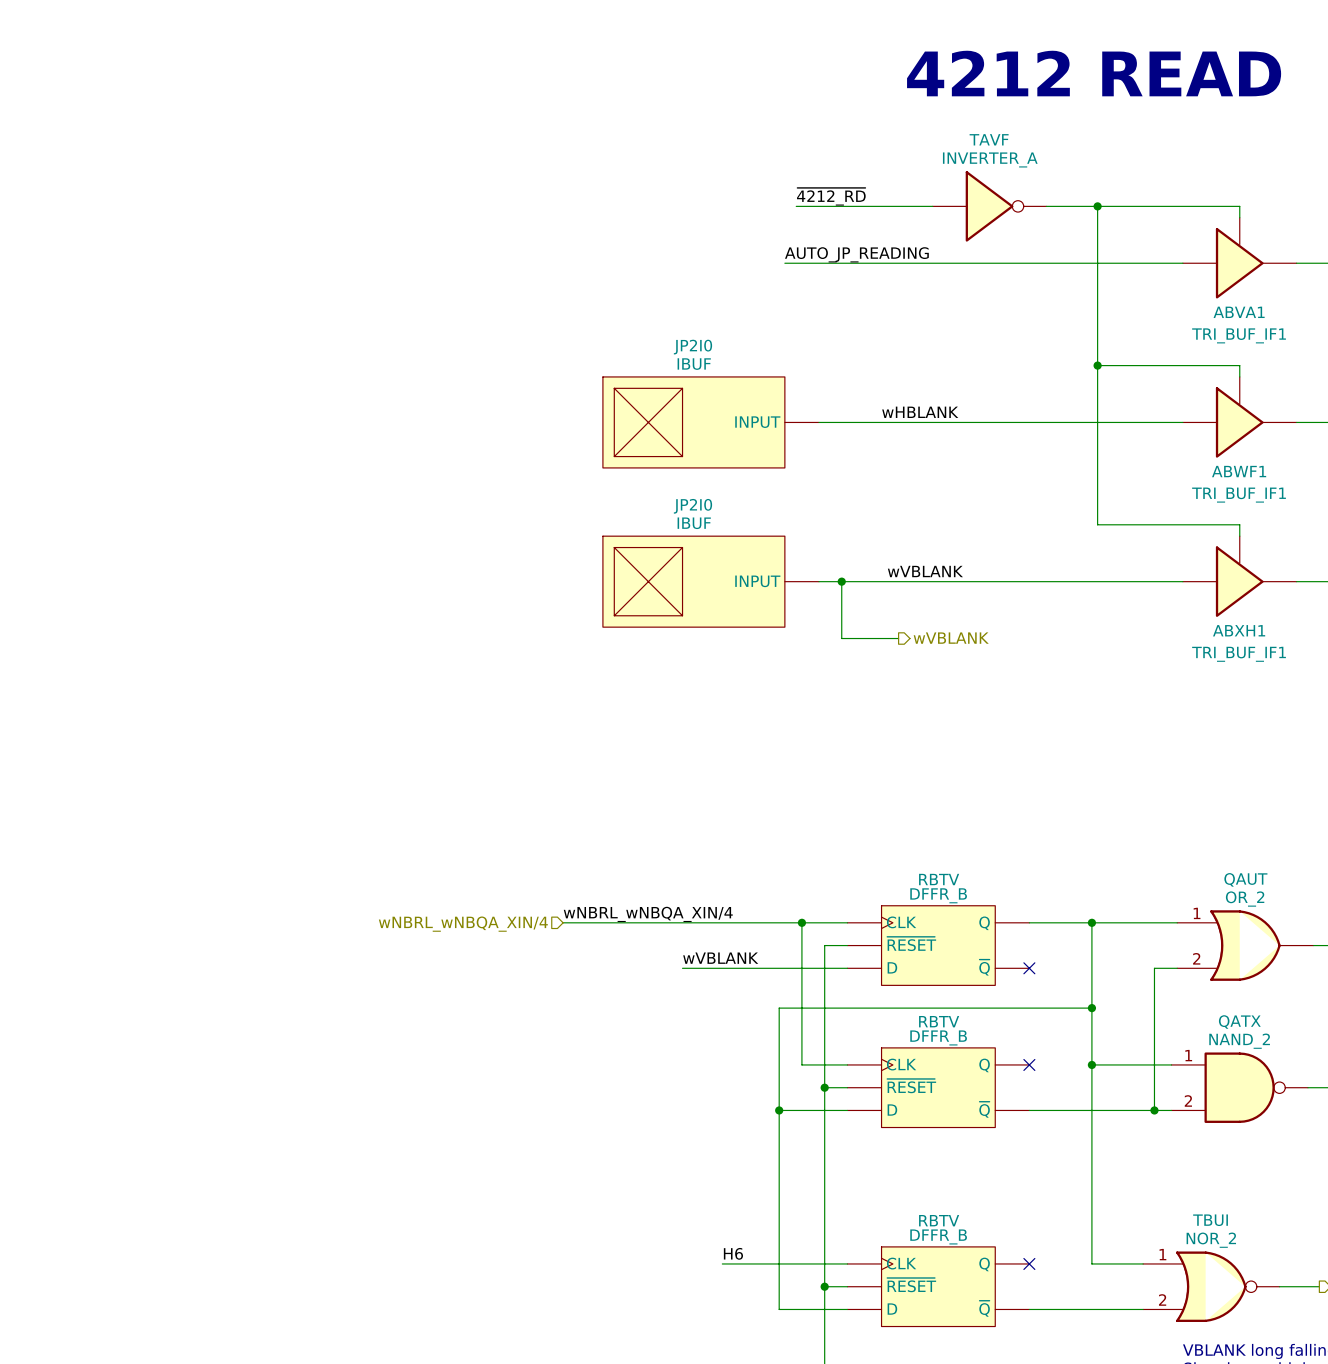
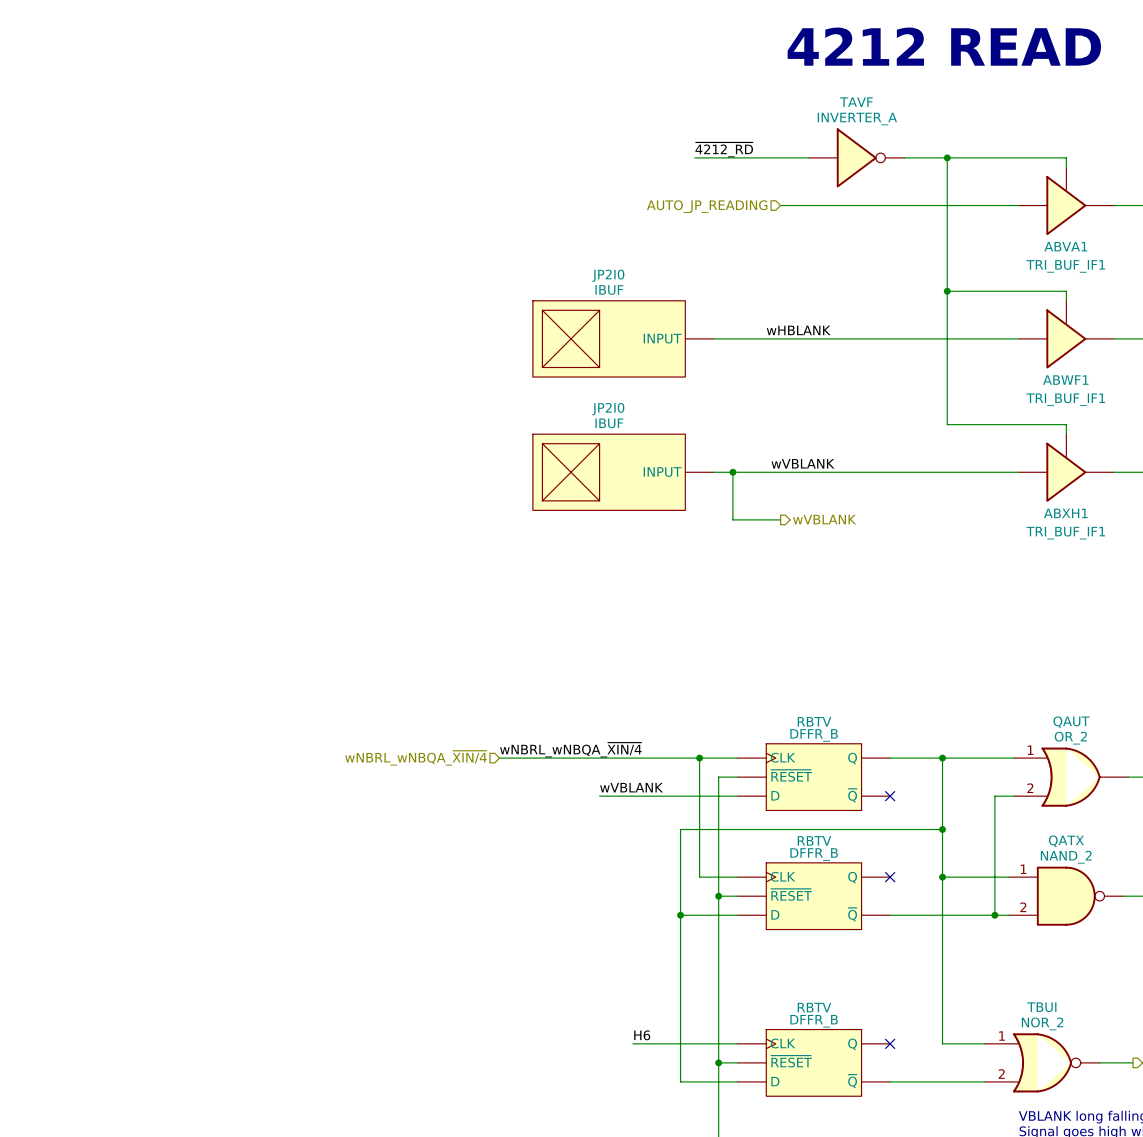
label: AUTO_JP_READING (856, 254) -> none
wire: (784, 263) (898, 263) -> none
hierarchical label: none -> AUTO_JP_READING (707, 206)
label: wNBRL_wNBQA_XIN/4 (648, 914) -> wNBRL_wNBQA_~{XIN/4} (570, 750)
hierarchical label: wNBRL_wNBQA_XIN/4 (463, 924) -> wNBRL_wNBQA_~{XIN/4} (415, 758)

